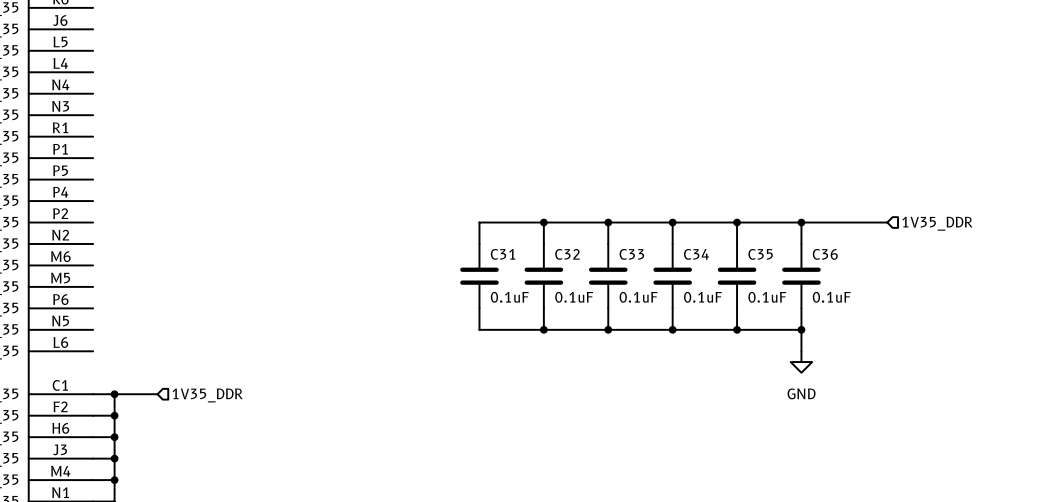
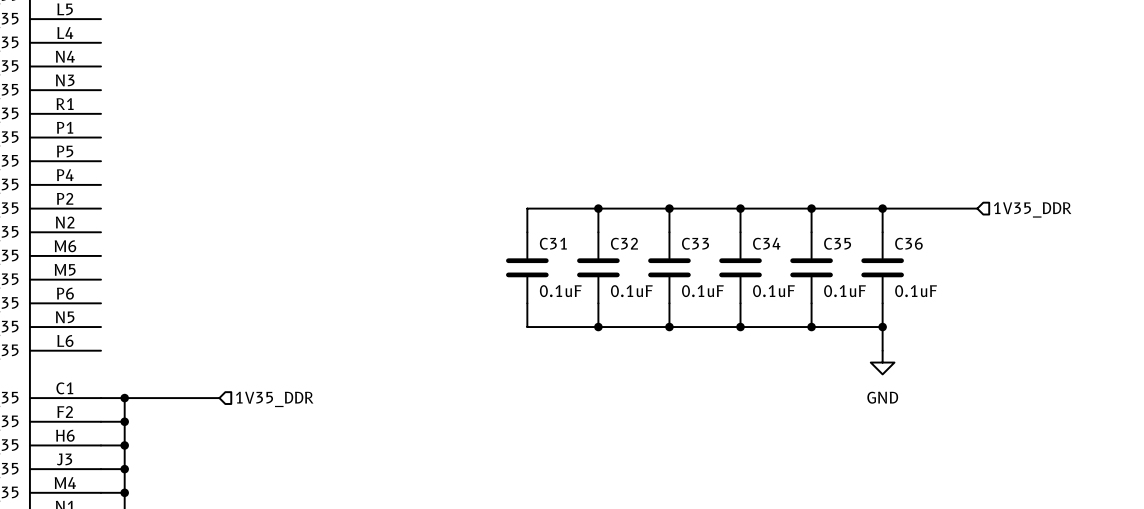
wire: none -> (172, 398) (219, 398)
hierarchical label position: 1V35_DDR (207, 395) -> 1V35_DDR (274, 399)

